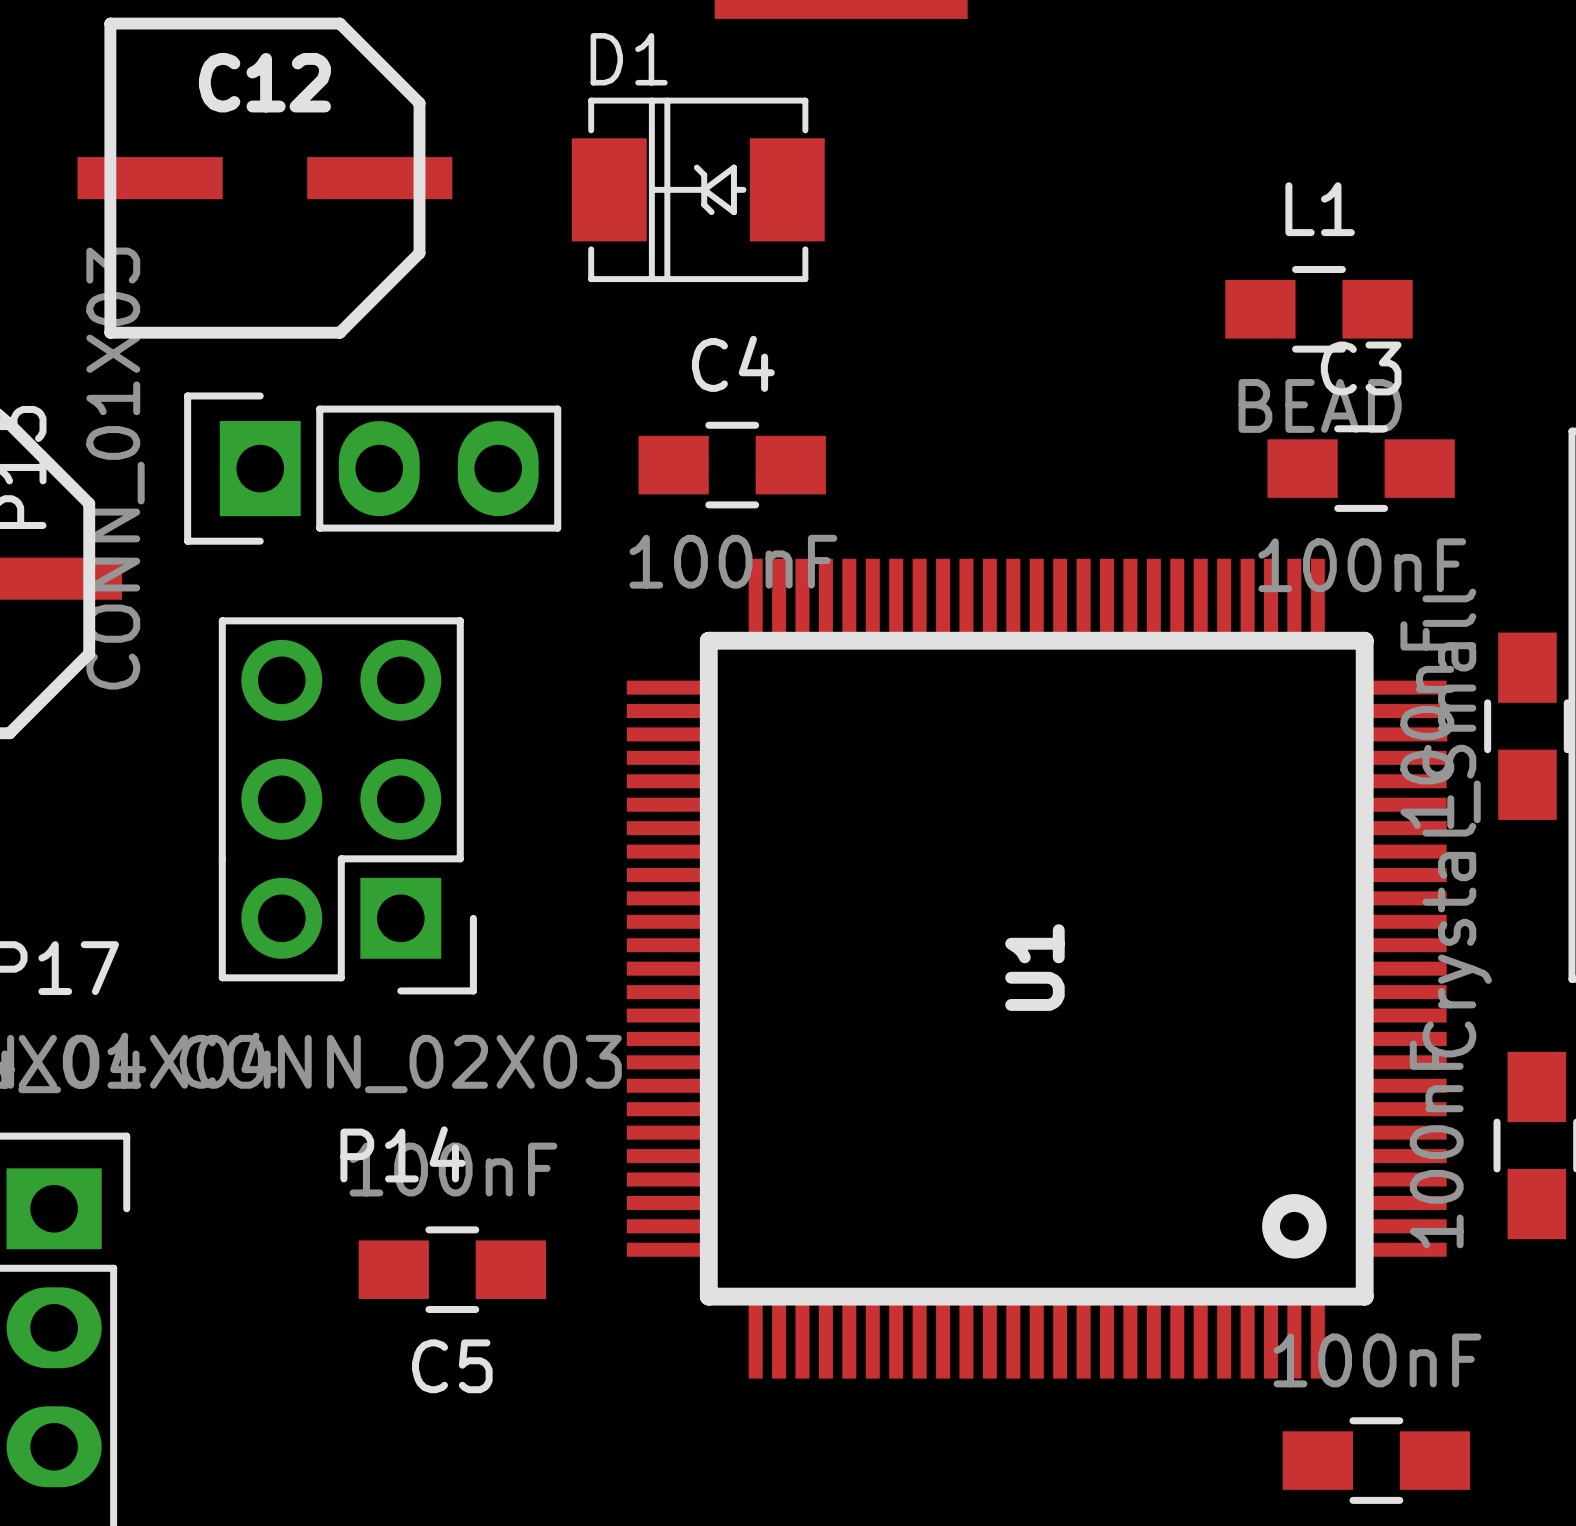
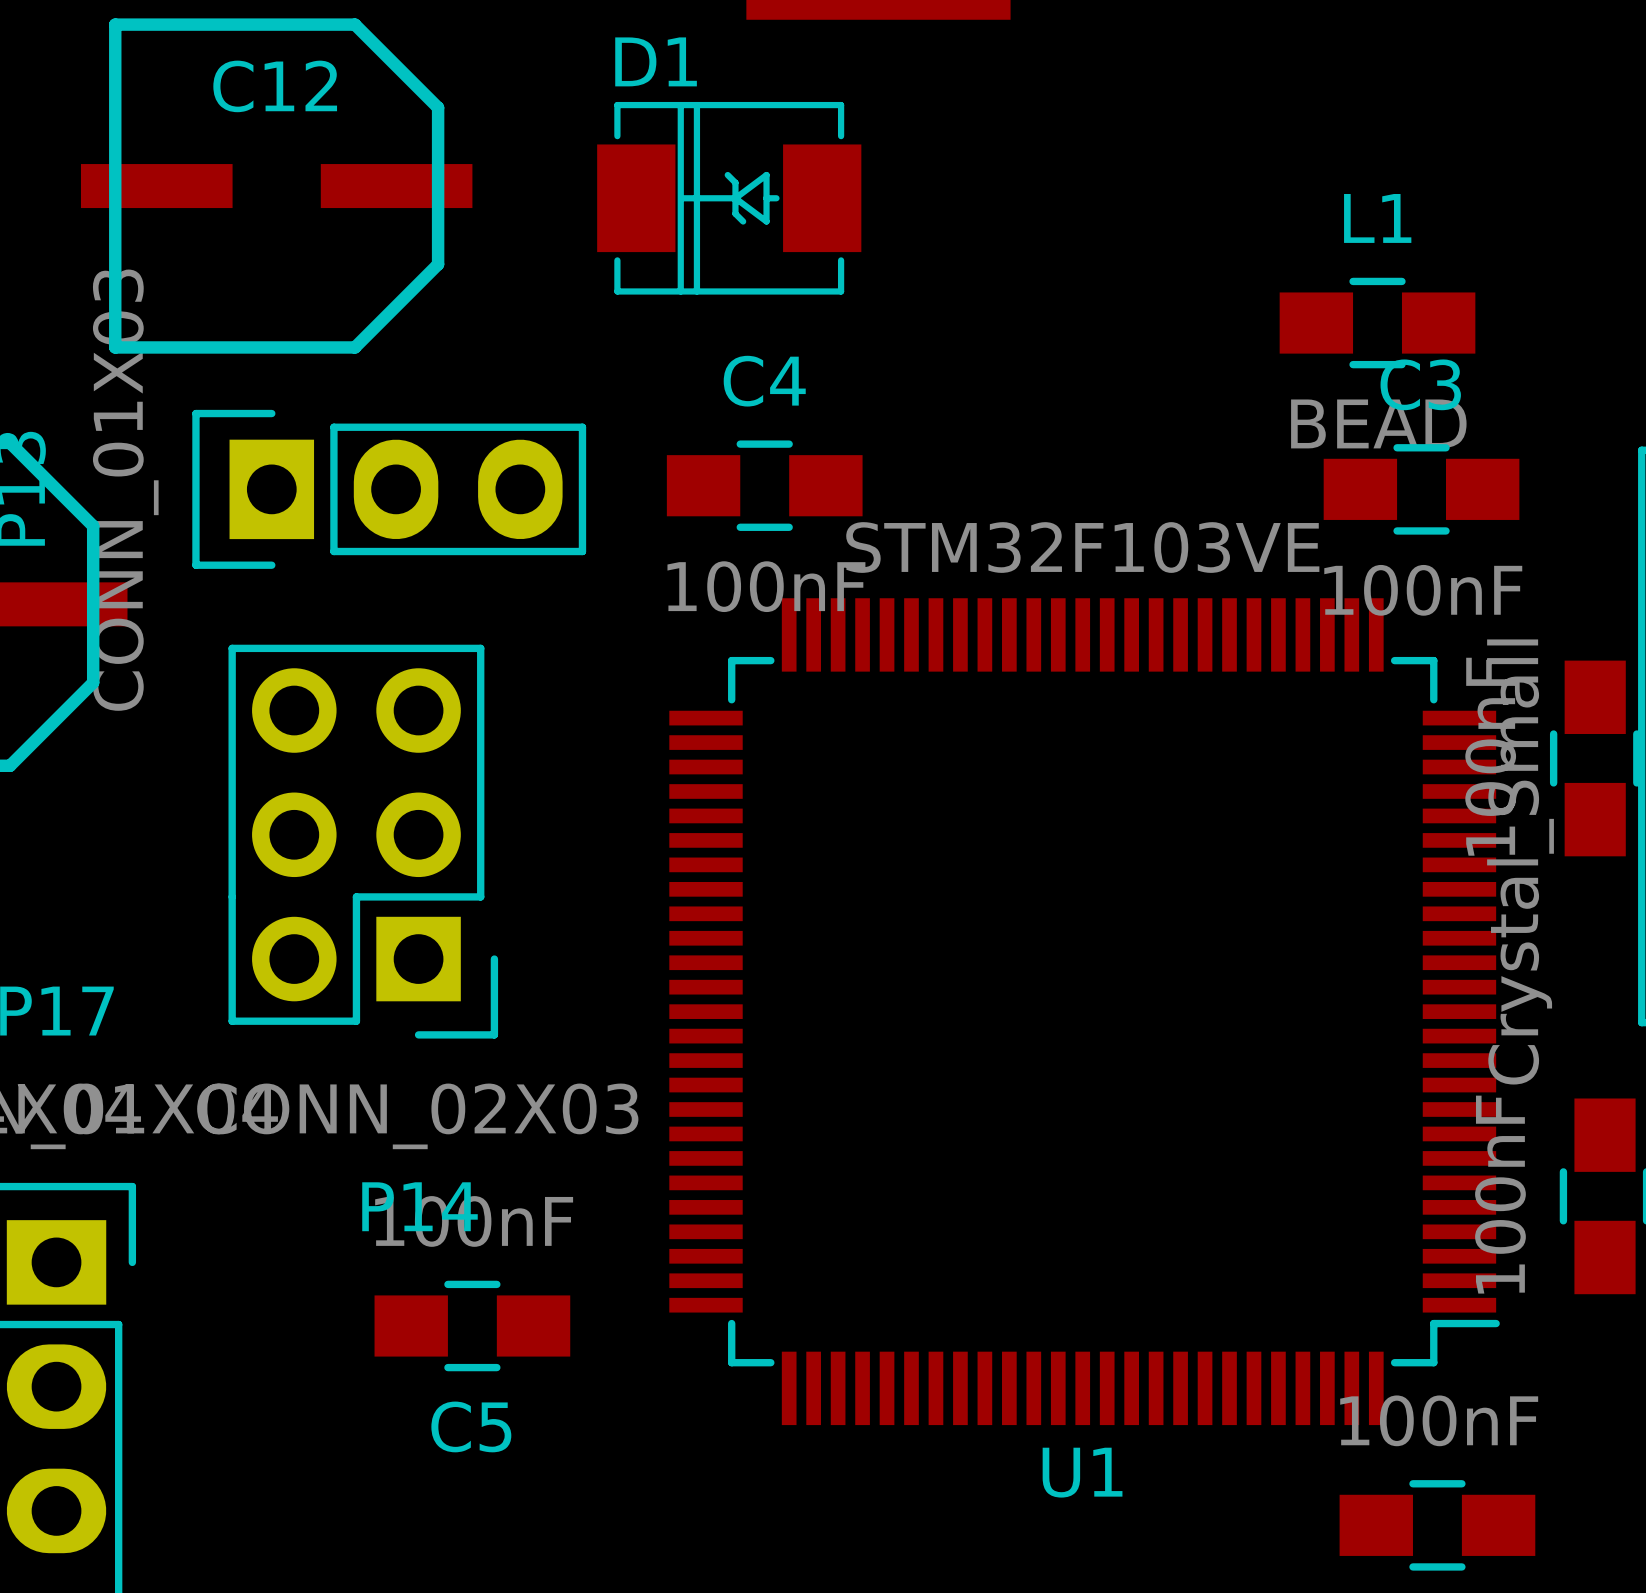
U1 value: none -> STM32F103VE (1082, 547)
U1 footprint: [626, 558, 1448, 1379] -> [669, 598, 1500, 1426]
U1 name position: U1 (1034, 967) -> U1 (1082, 1472)

